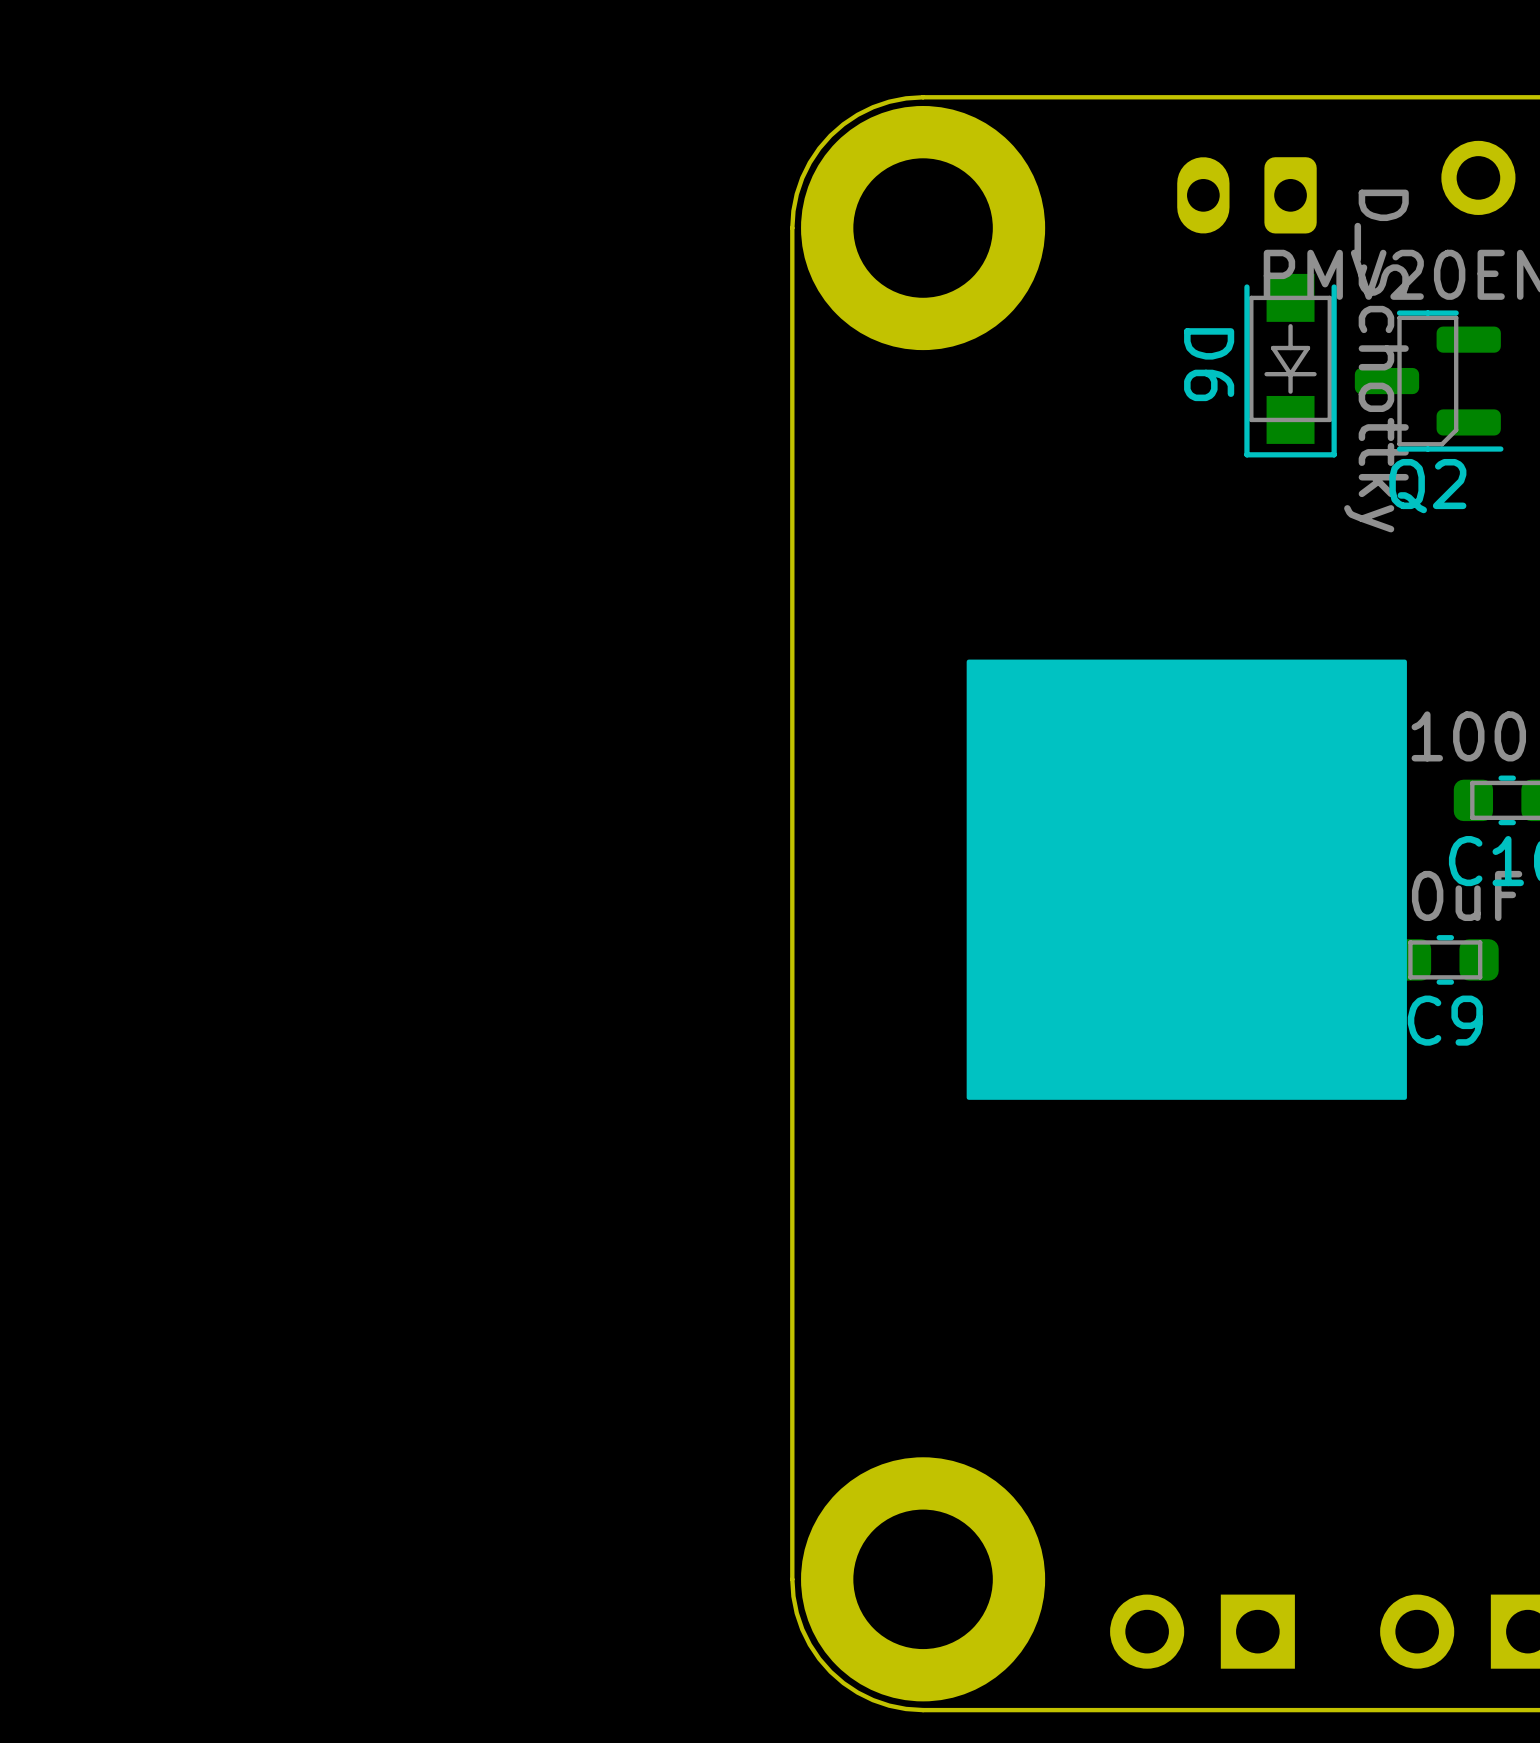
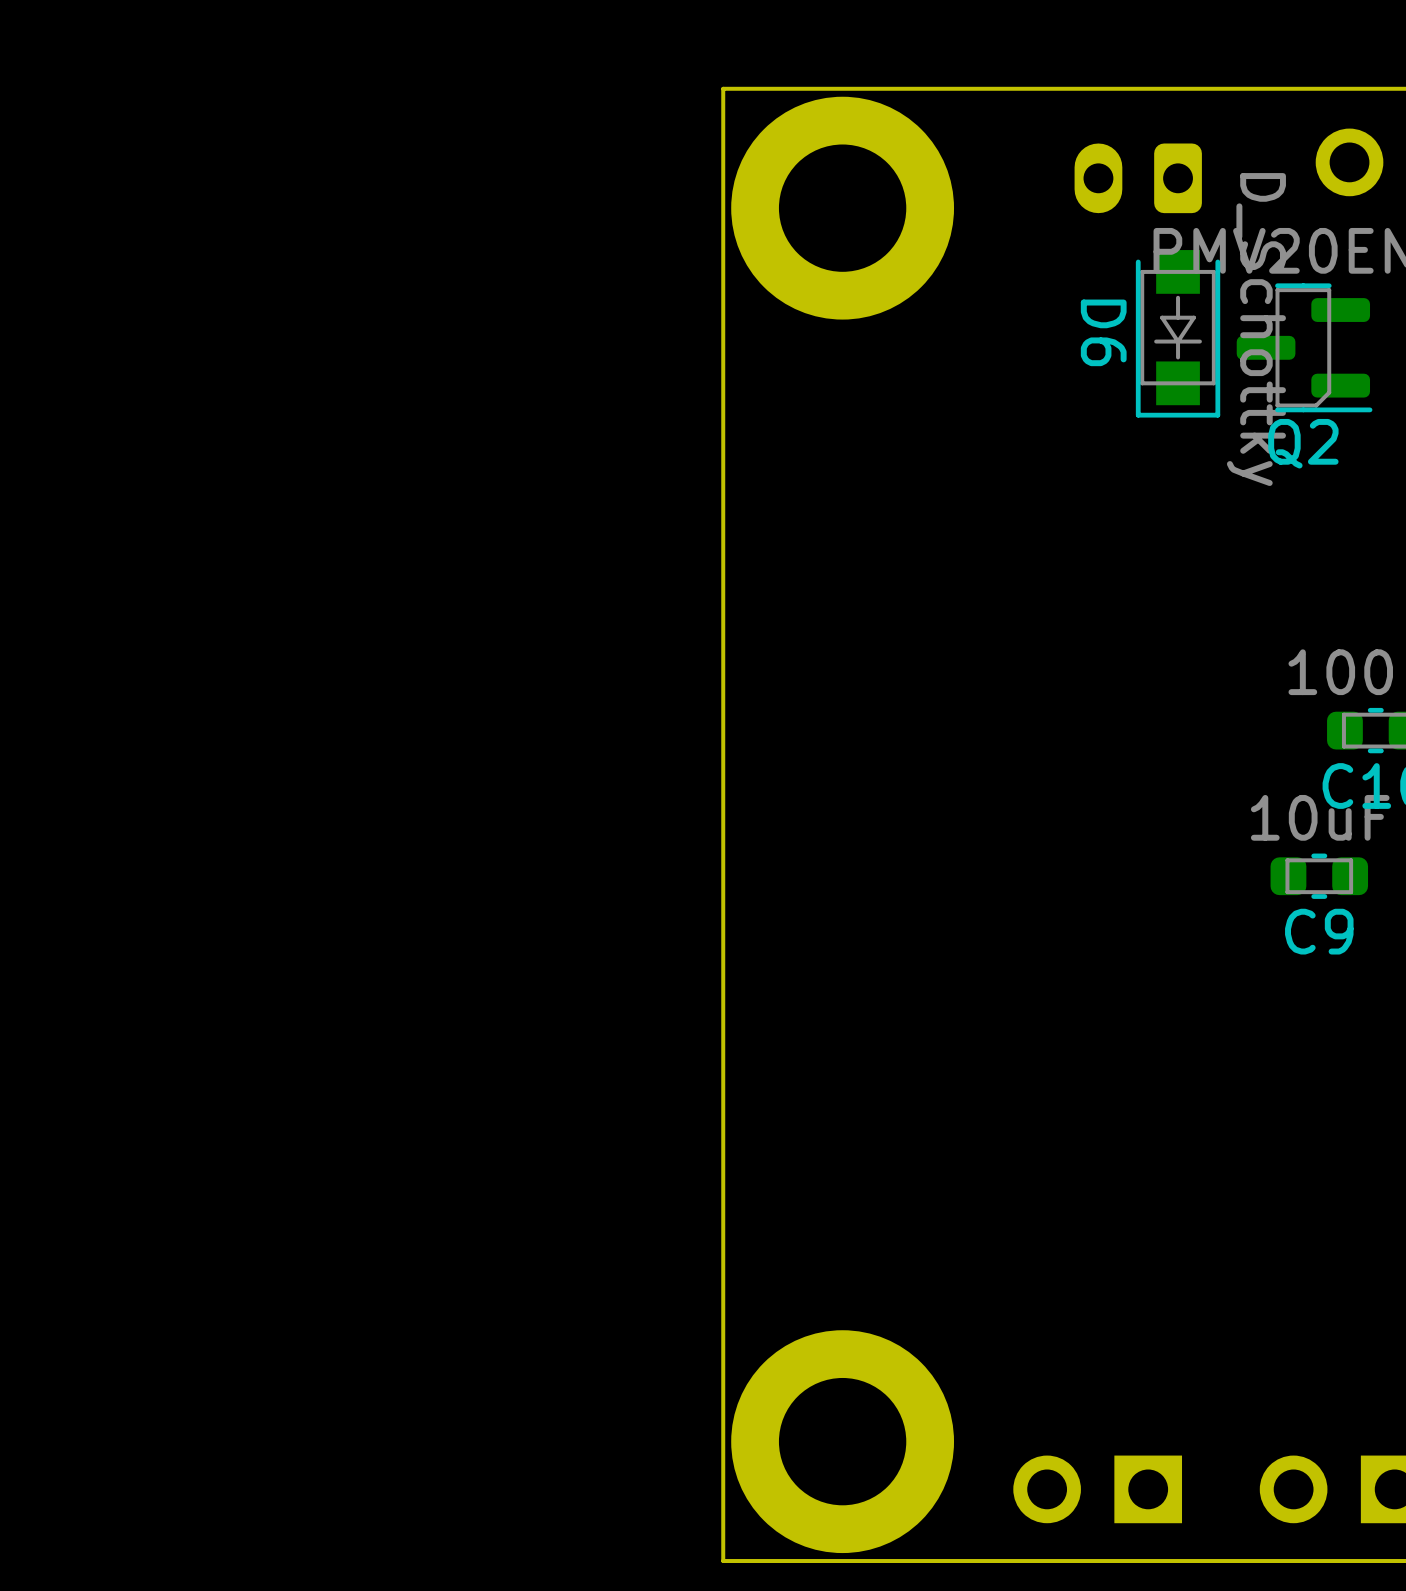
board edge: (923, 97) (889, 101) (873, 107) (843, 124) (830, 135) (809, 162) (802, 178) (796, 194) (792, 228) -> (842, 88) (723, 88) (723, 208)
drawing: [966, 659, 1407, 1100] -> none
board edge: (792, 1579) (796, 1613) (802, 1629) (819, 1658) (830, 1671) (857, 1692) (873, 1700) (906, 1708) (923, 1710) -> (723, 1441) (723, 1561) (842, 1561)

